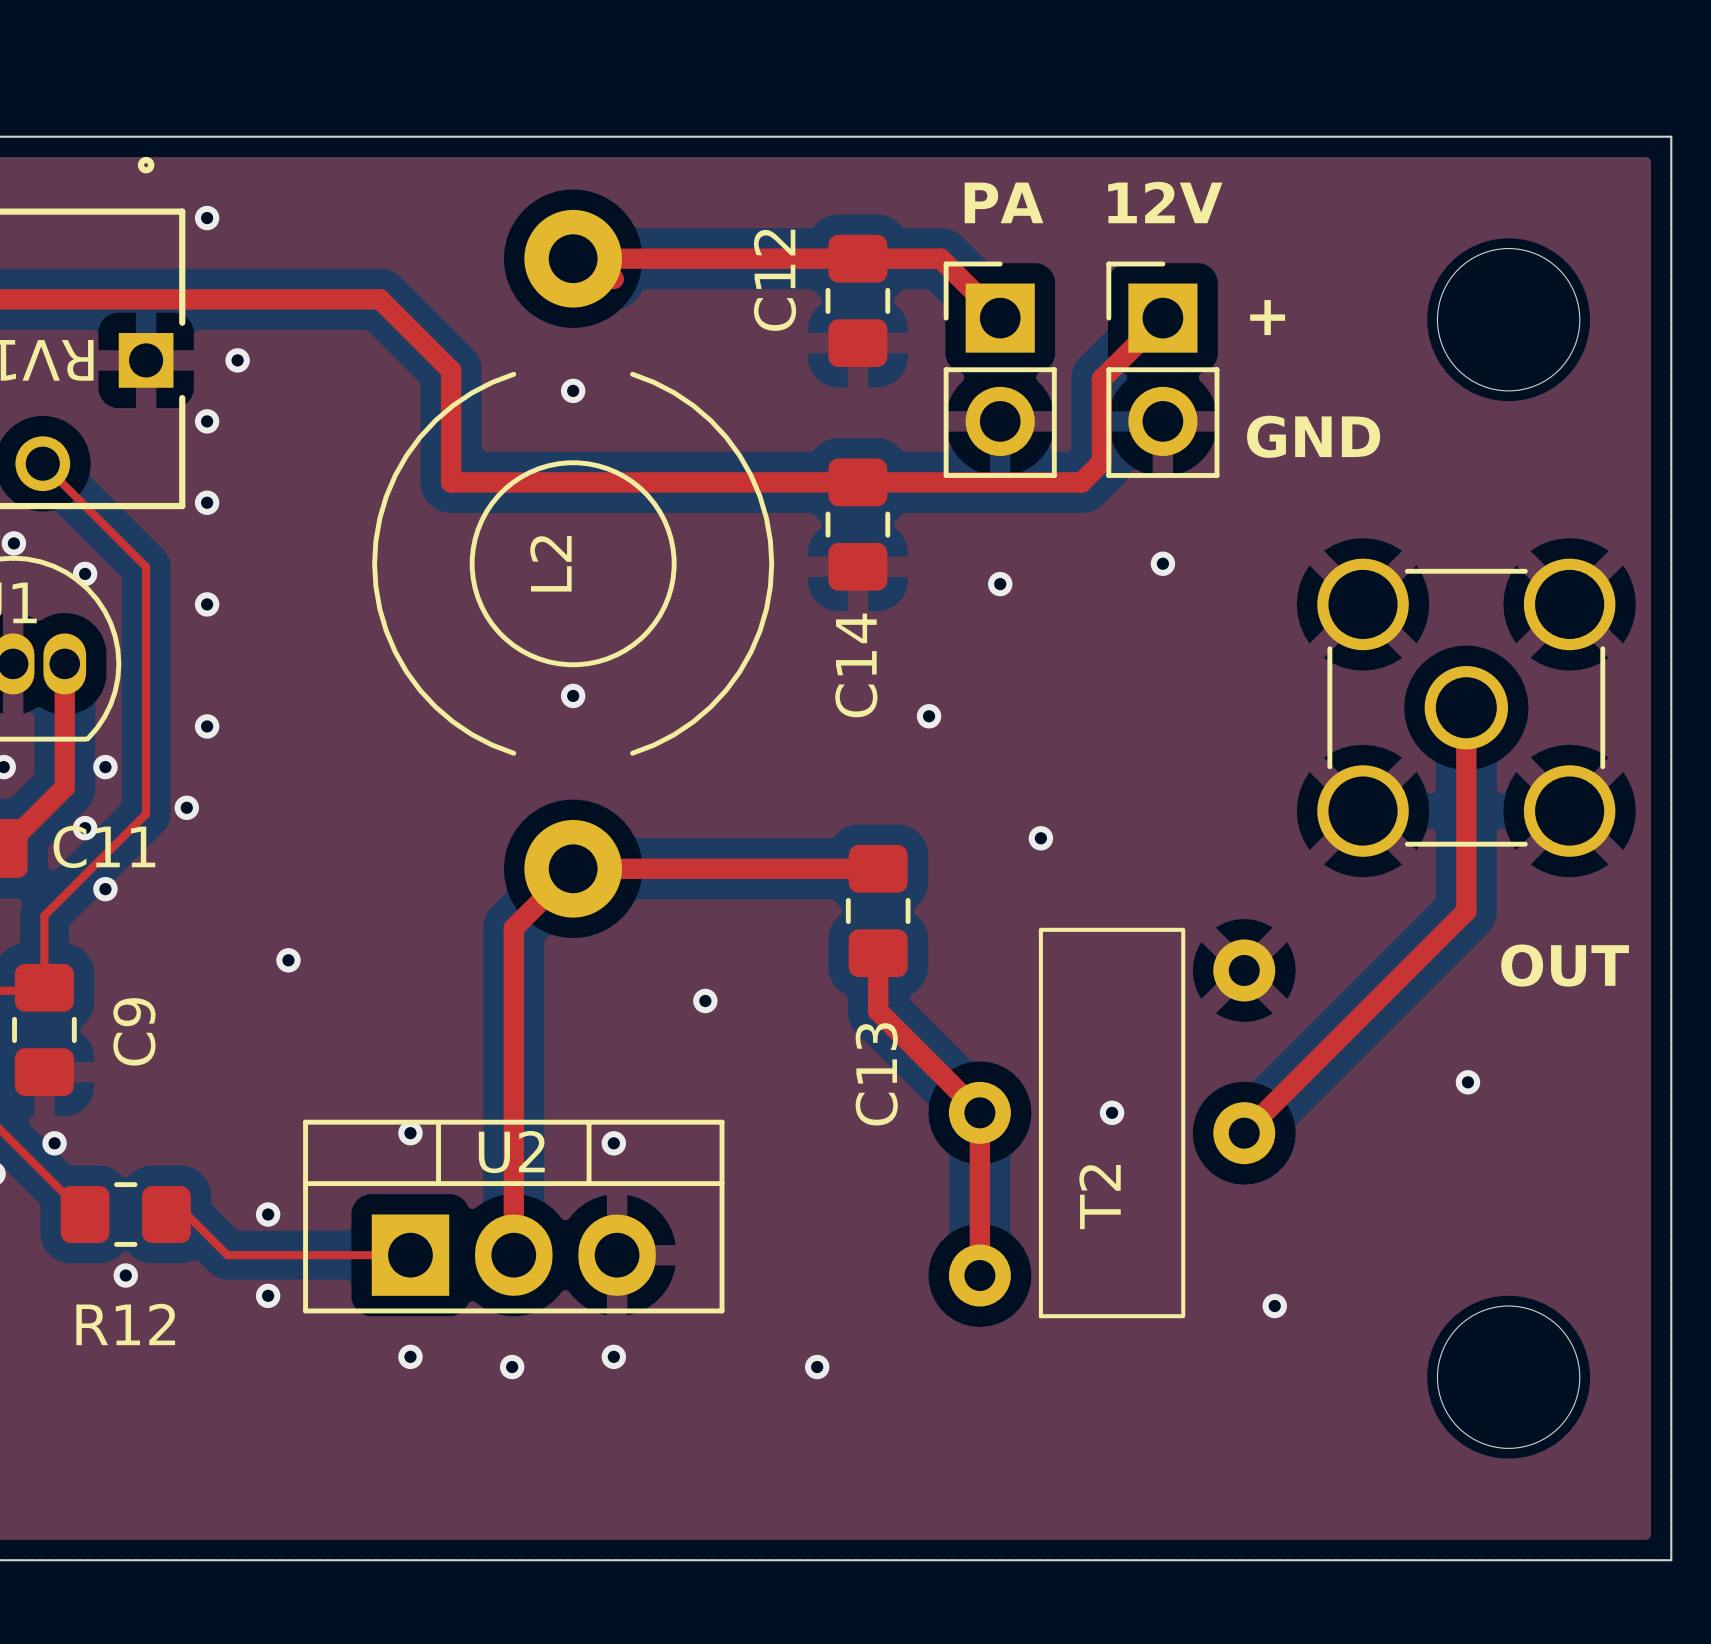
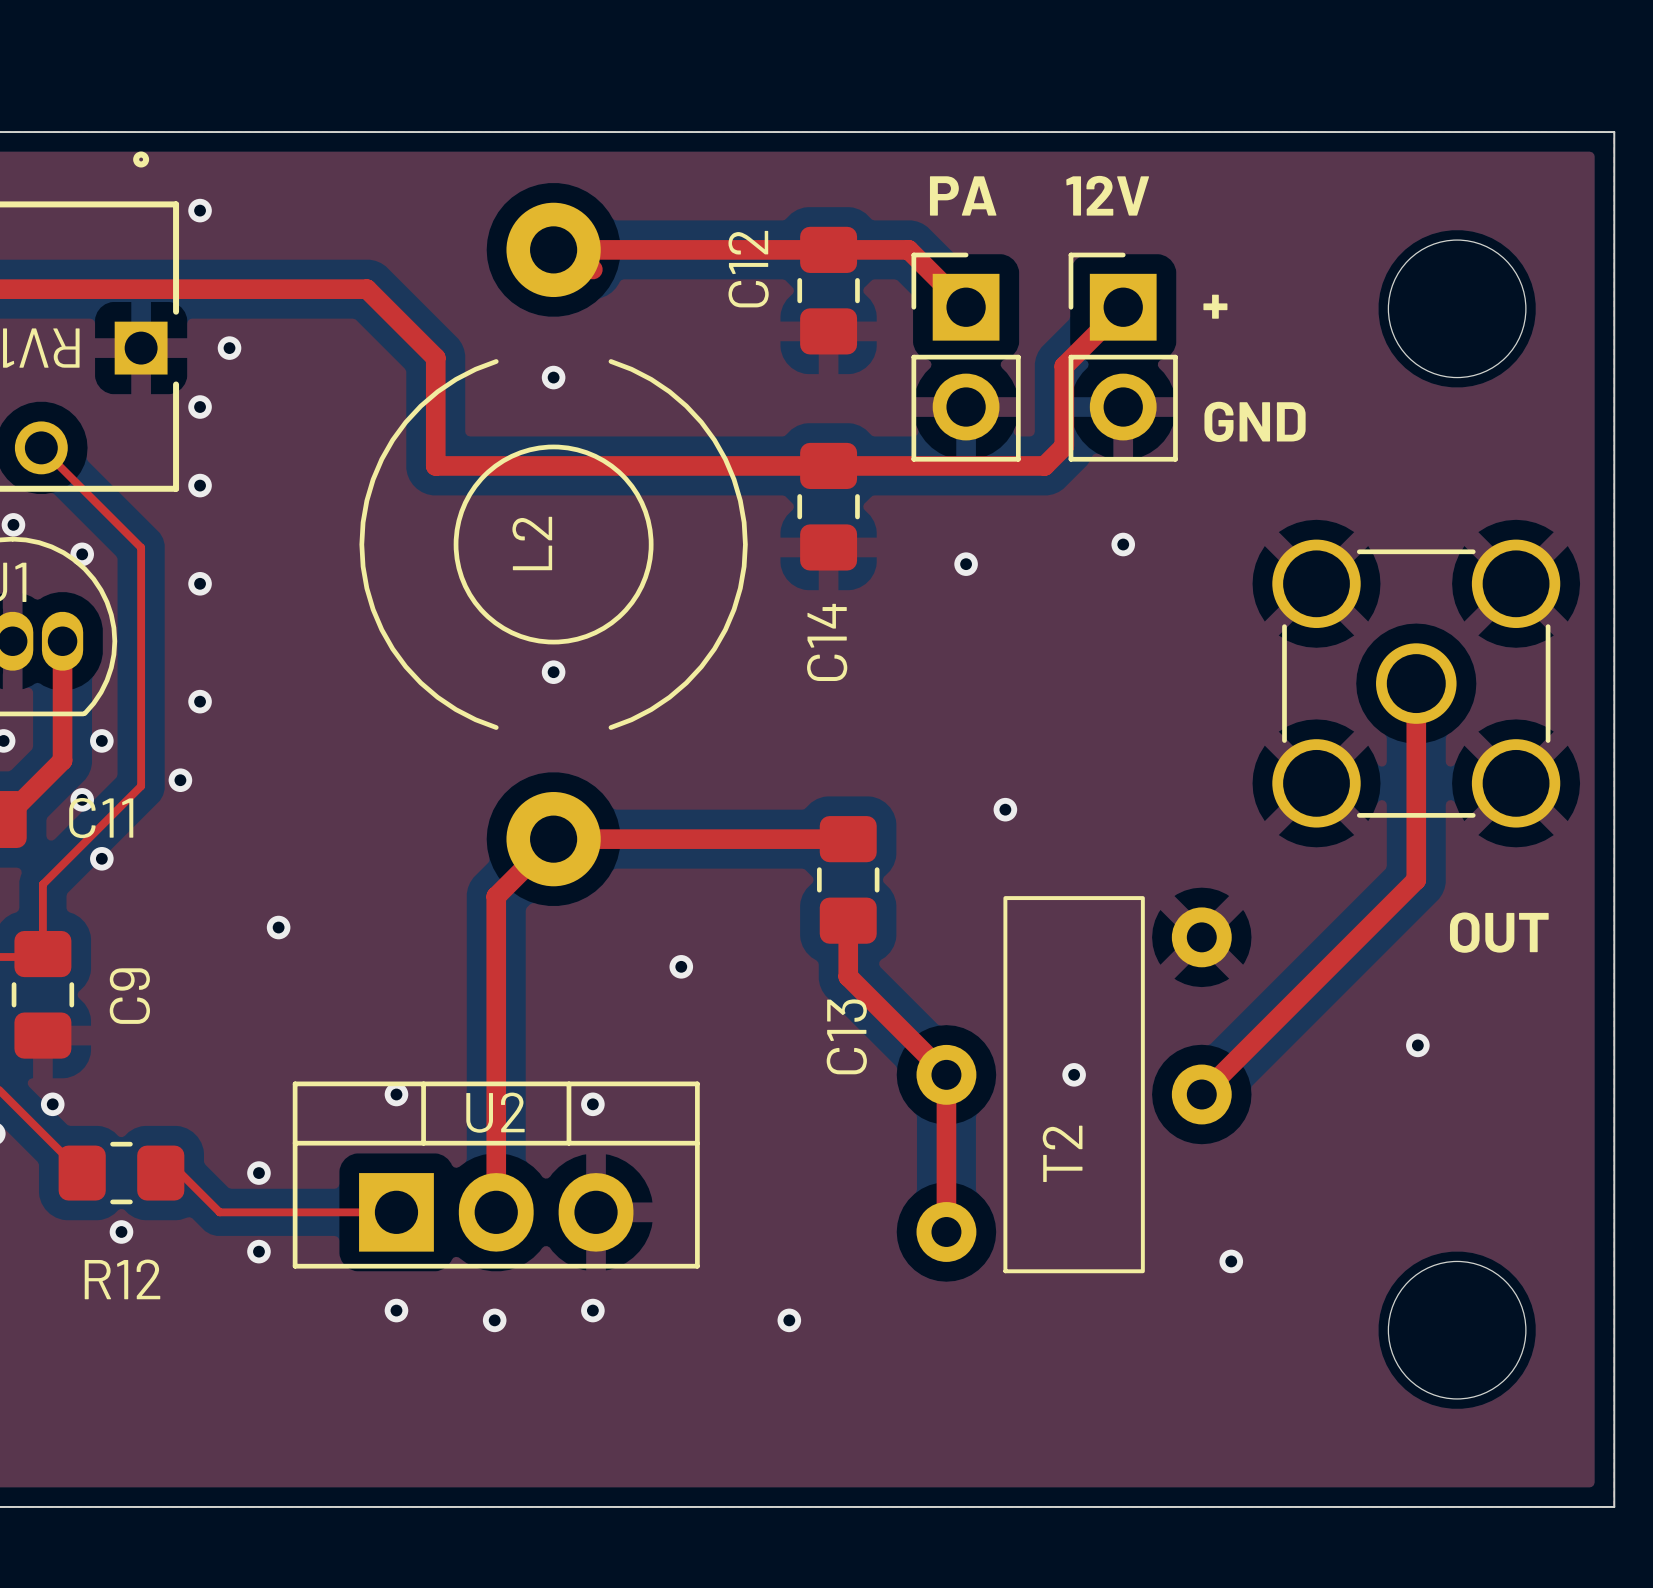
via: (929, 716) -> none

